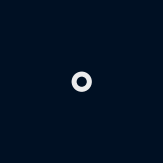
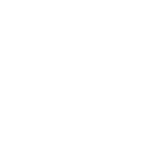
via: (81, 81) -> none

